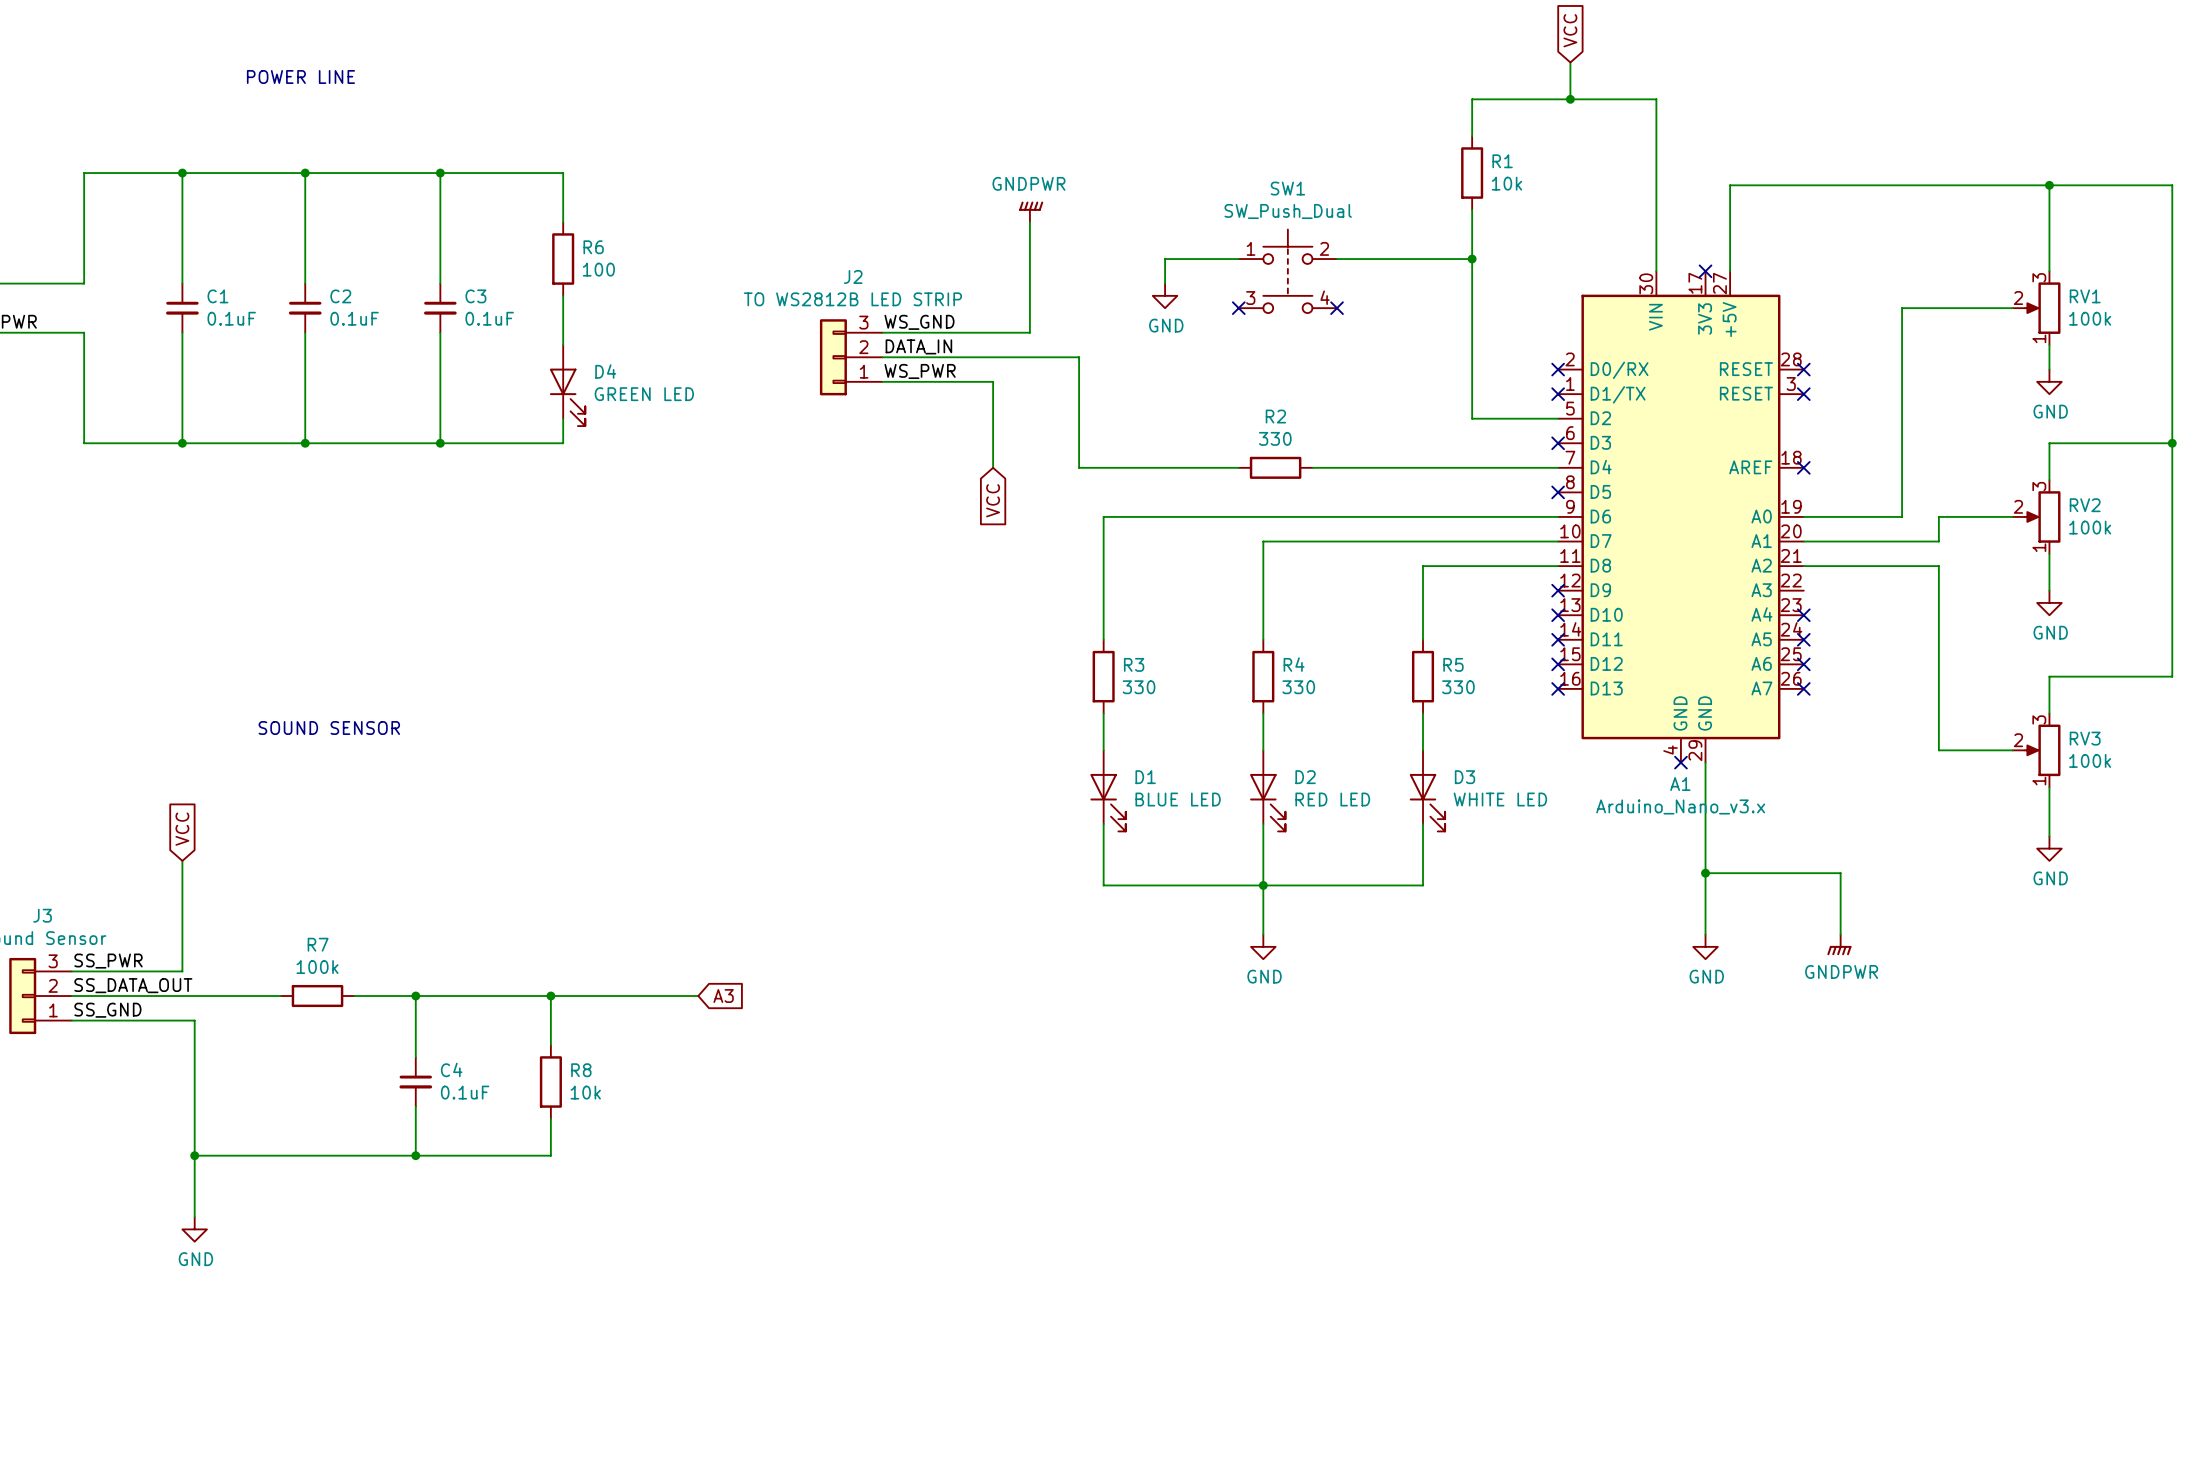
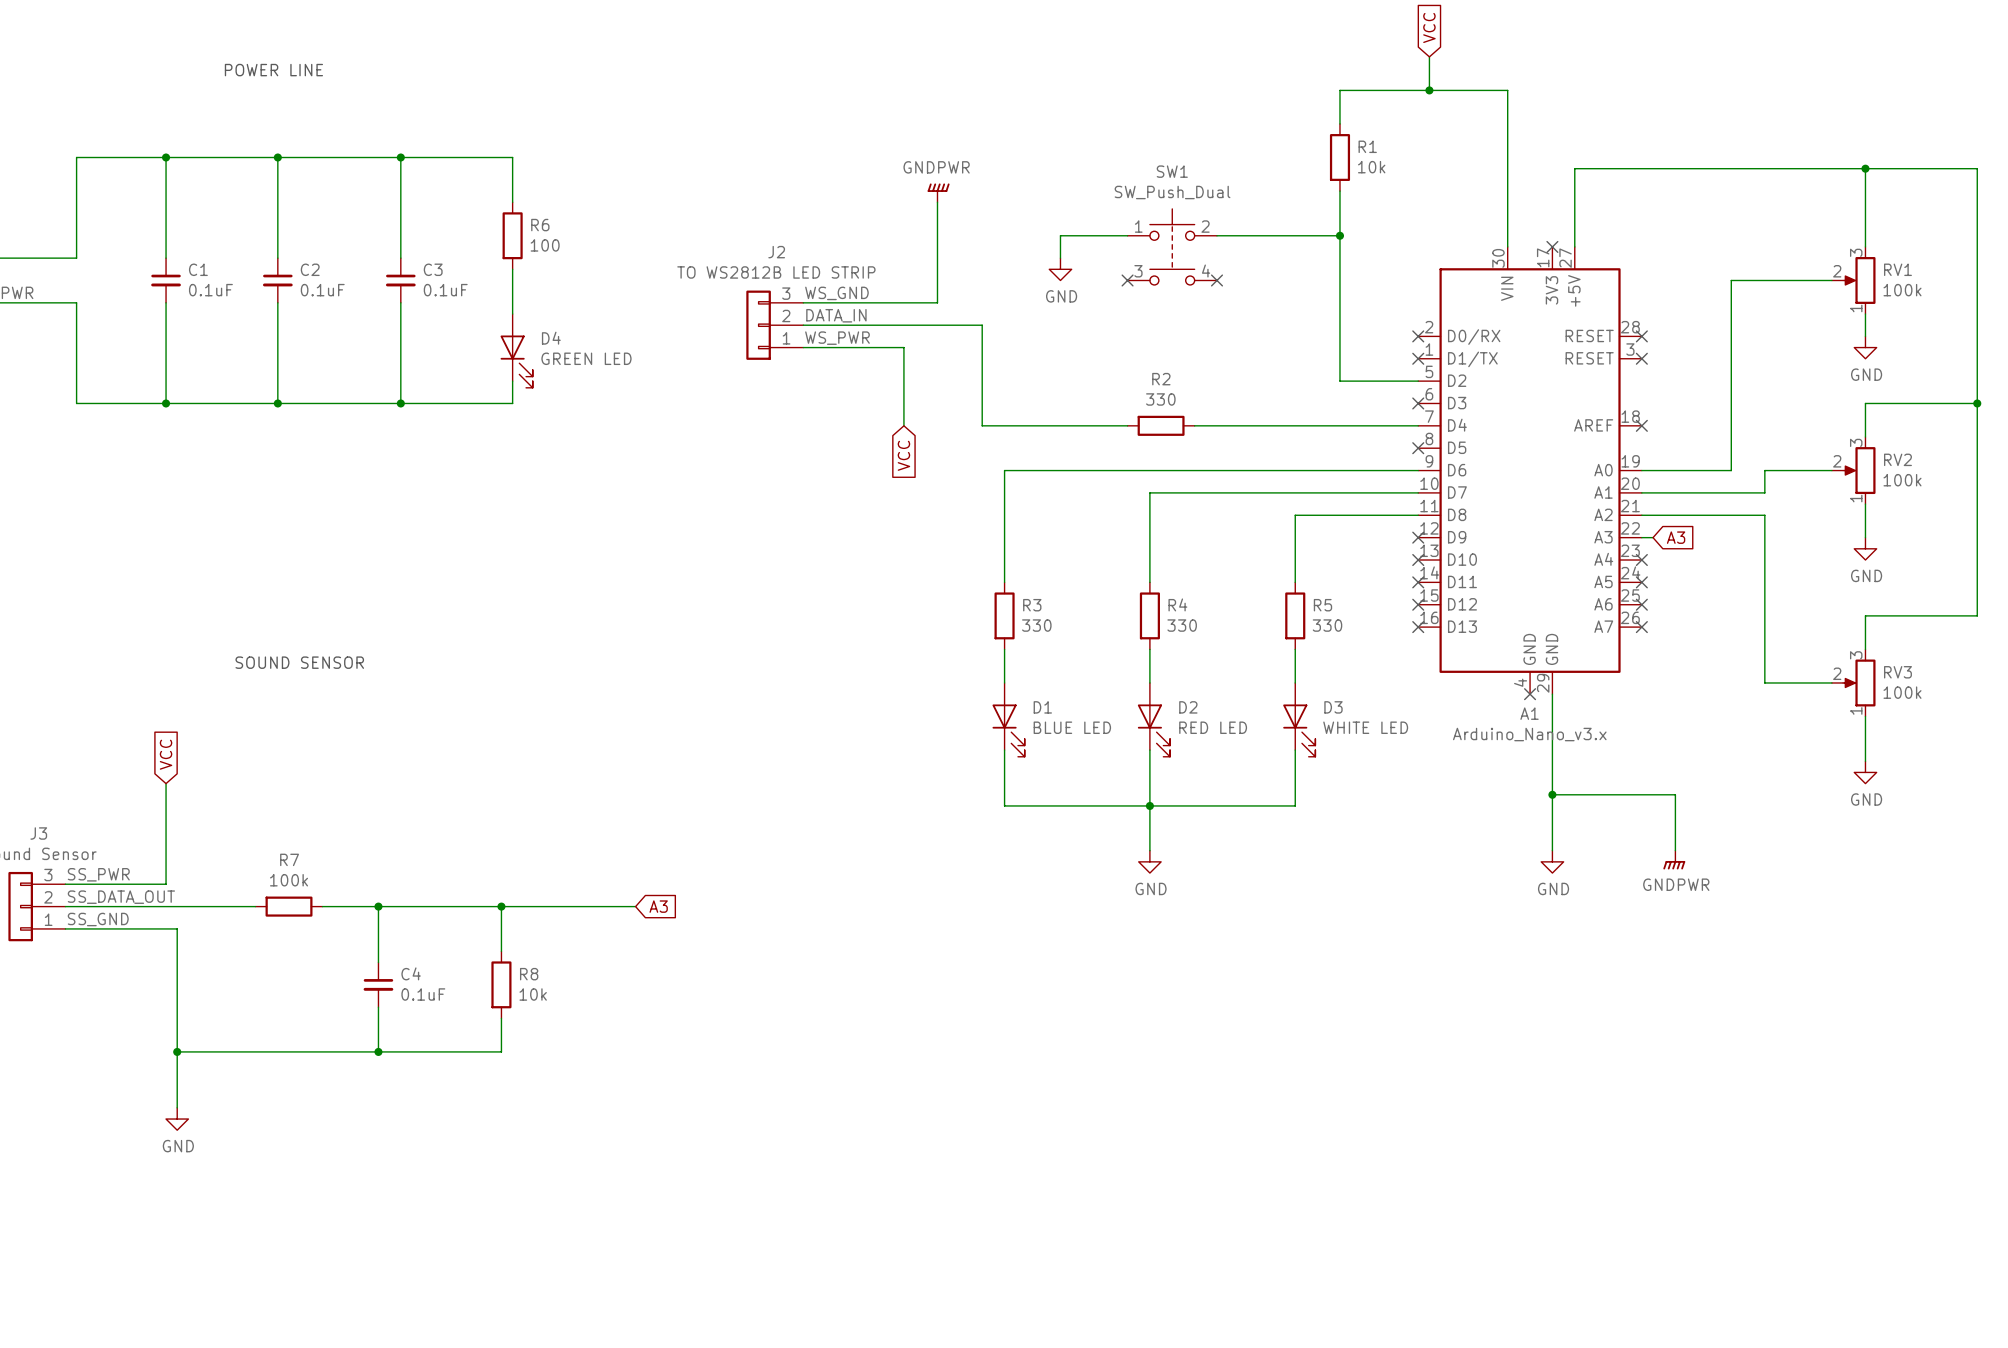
wire: none -> (1641, 537) (1653, 537)
global label: none -> A3 (1676, 537)

